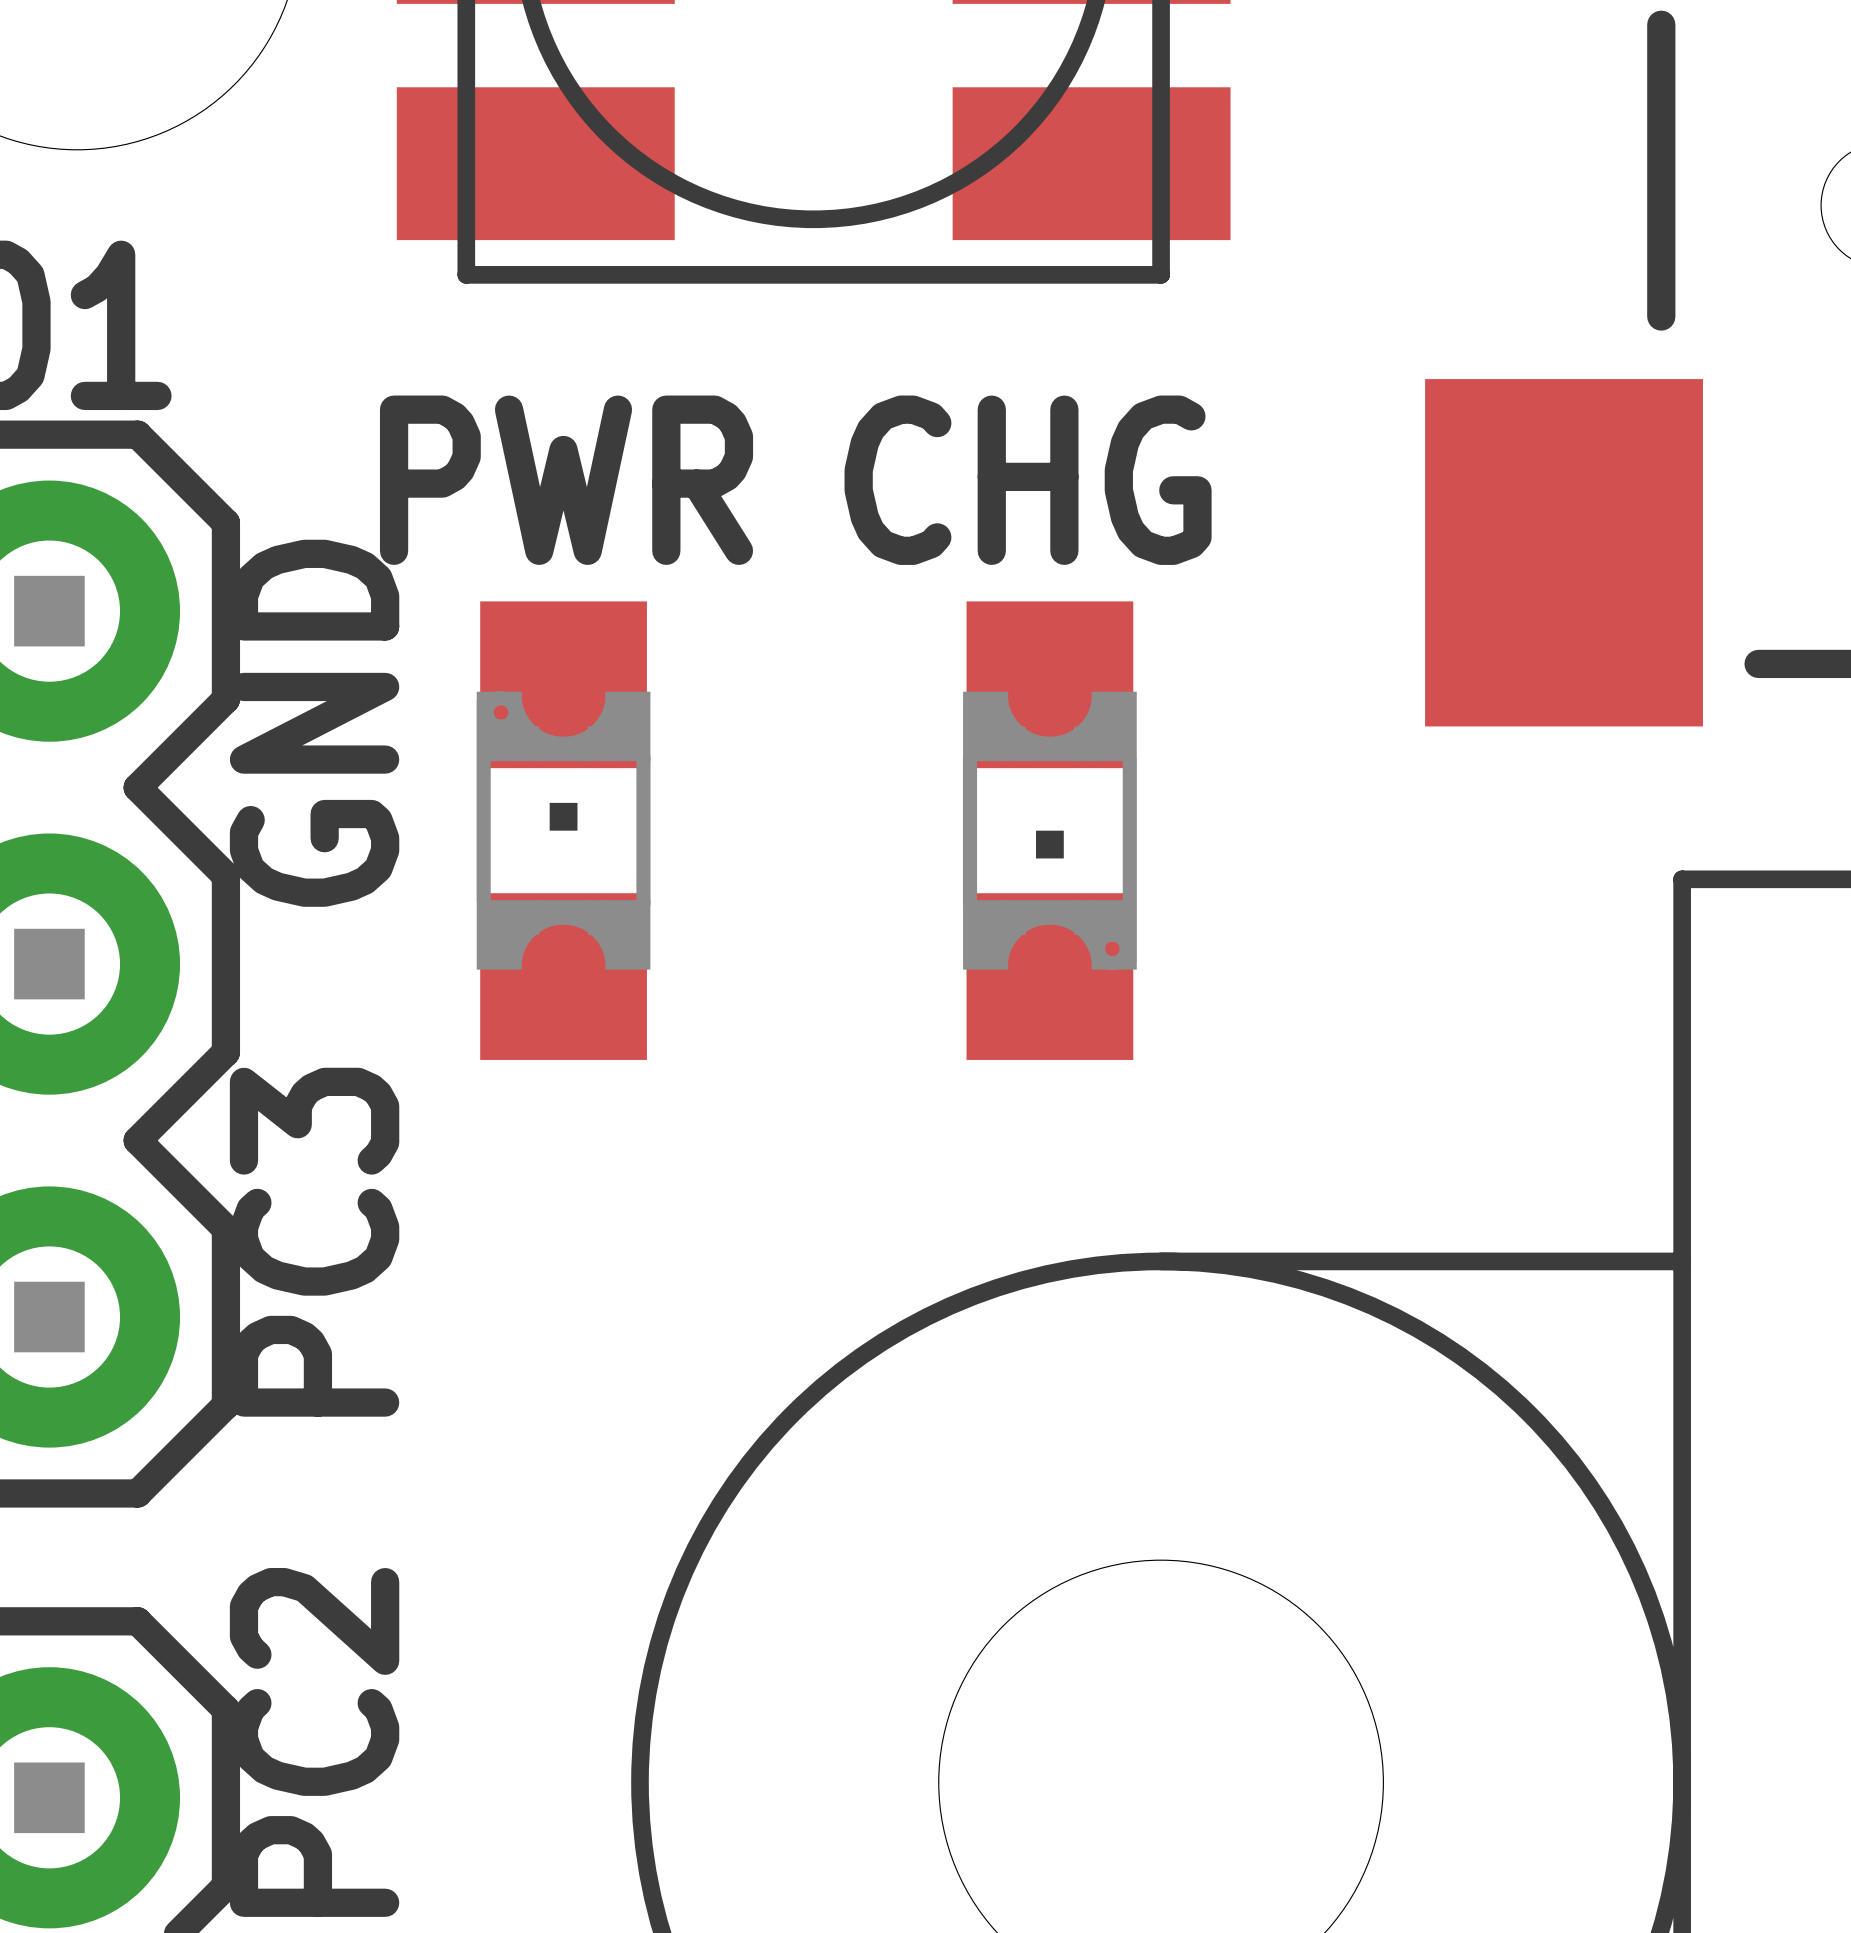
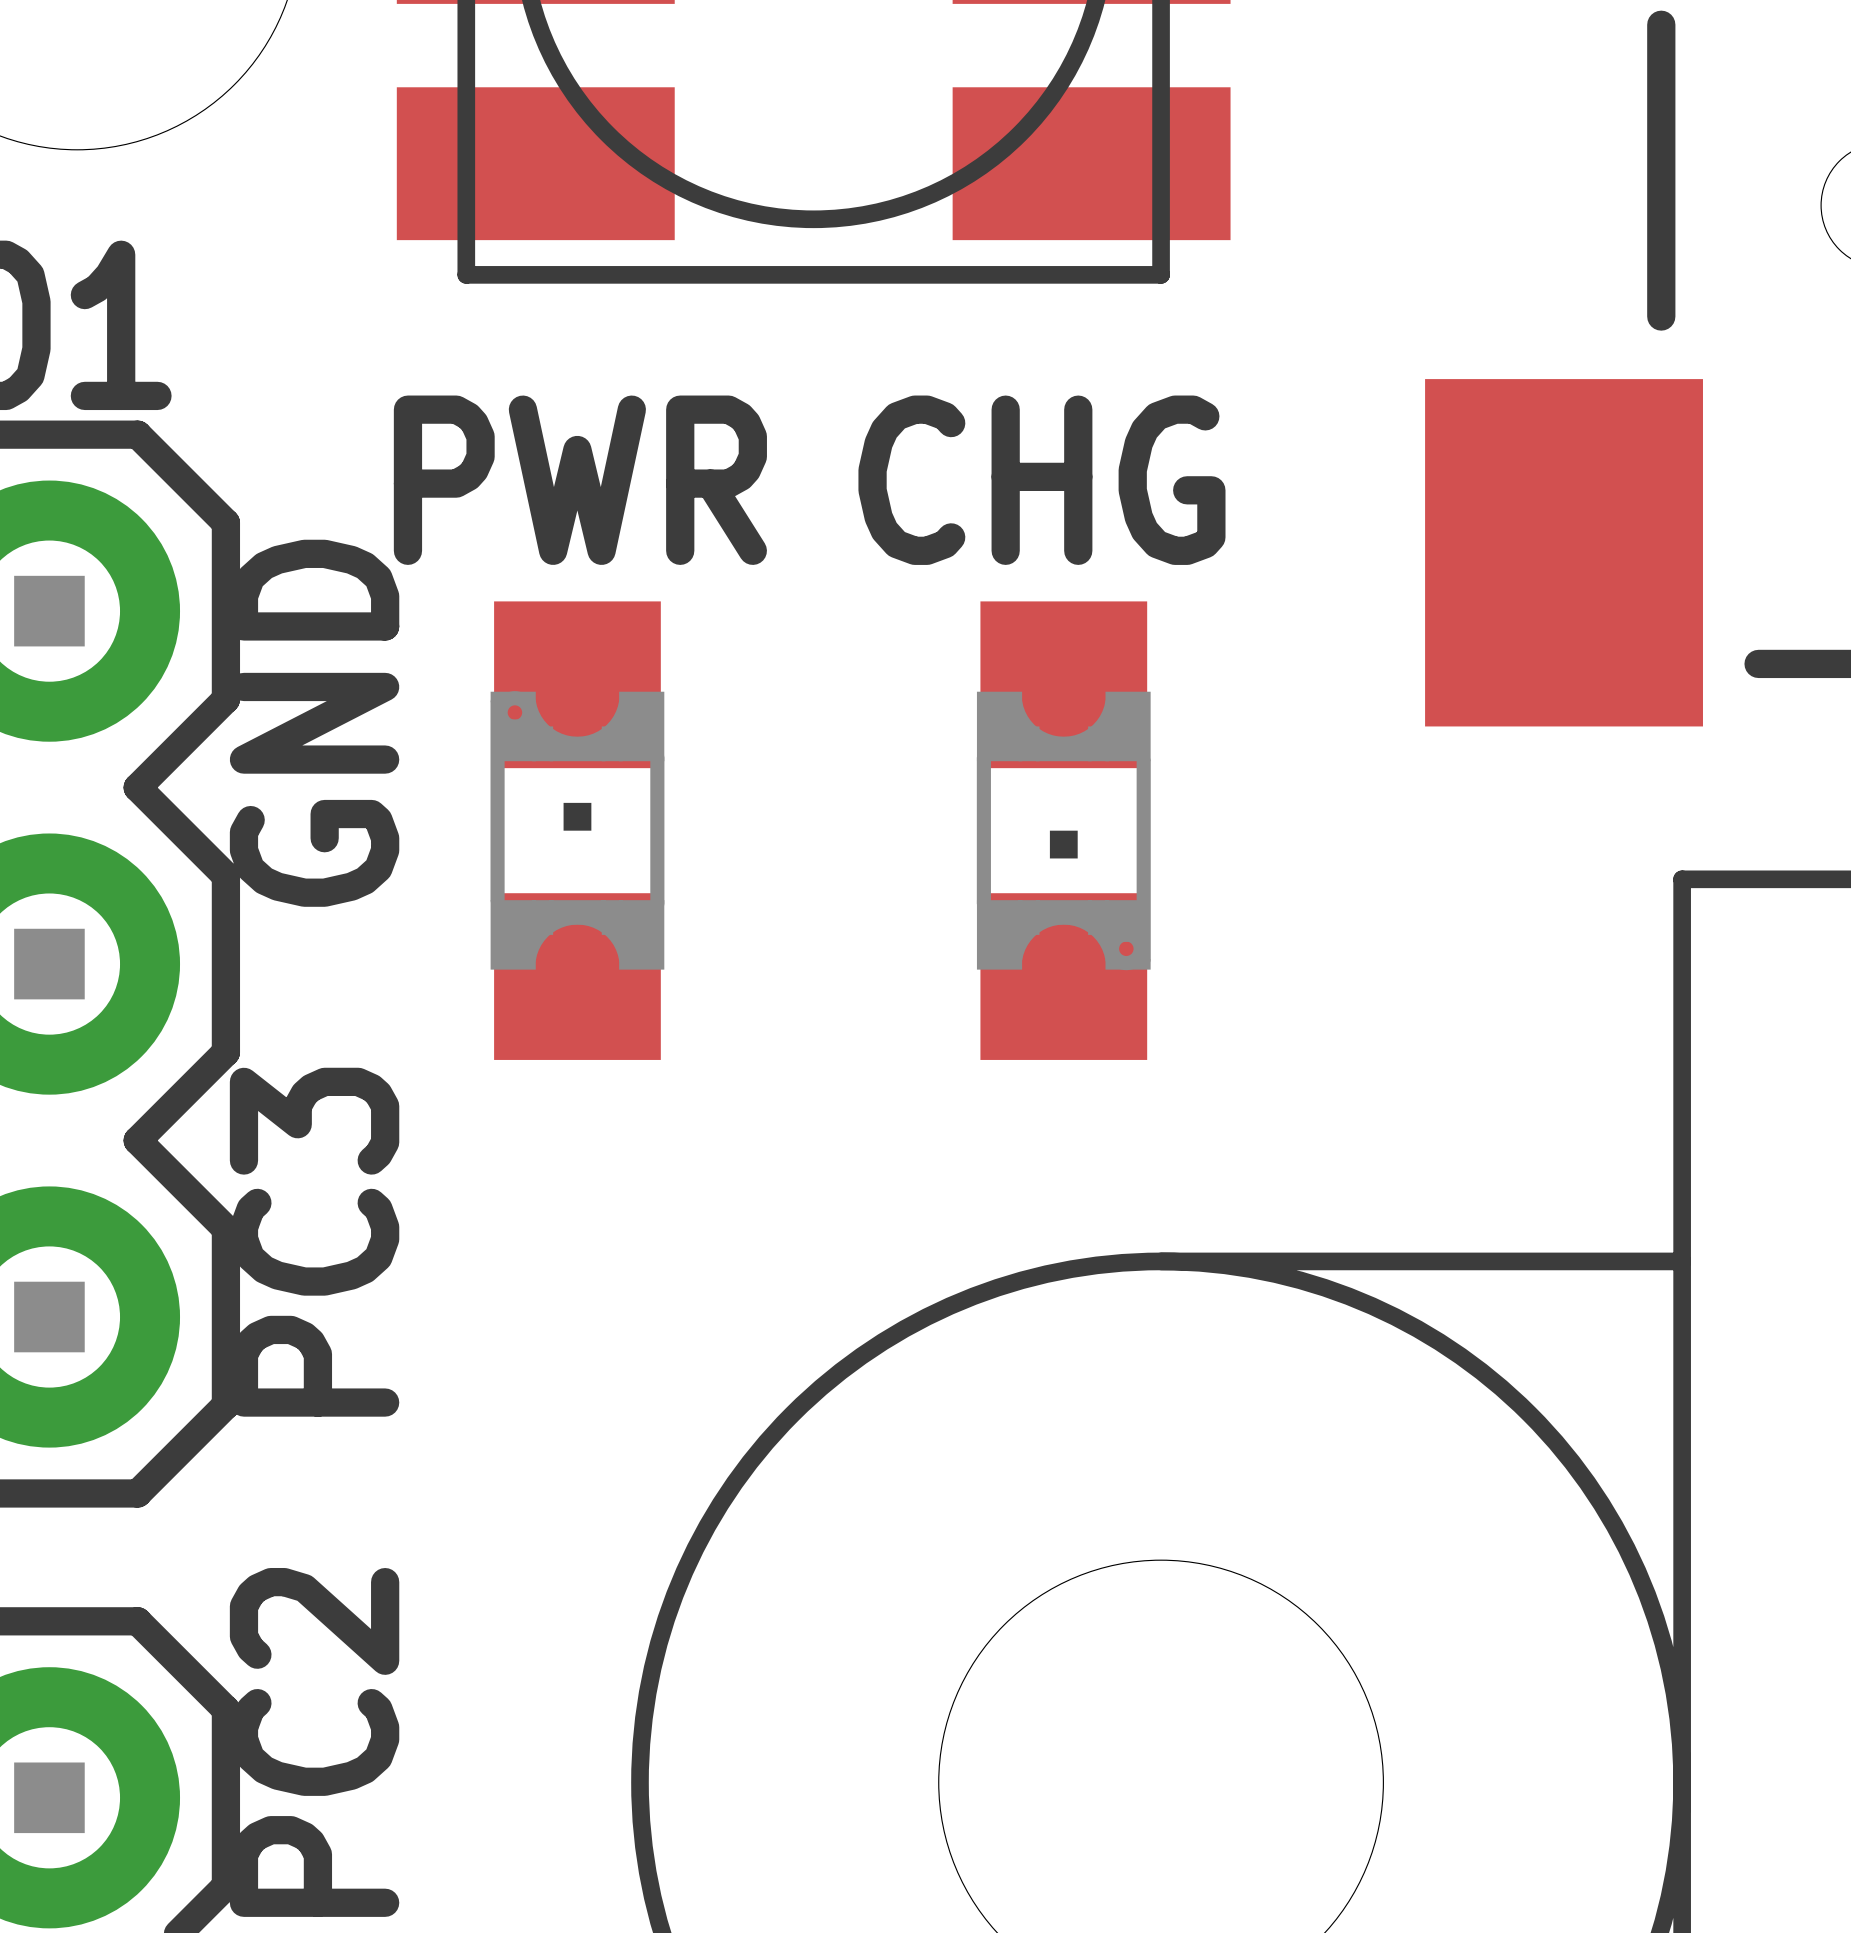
PWR position: (563, 830) -> (577, 830)
CHG position: (1049, 830) -> (1063, 830)

